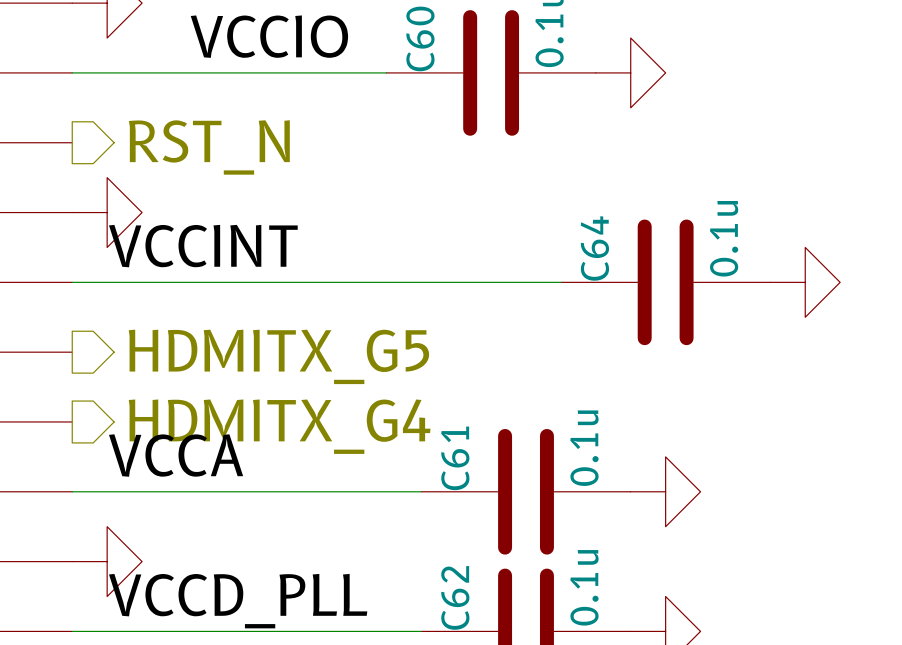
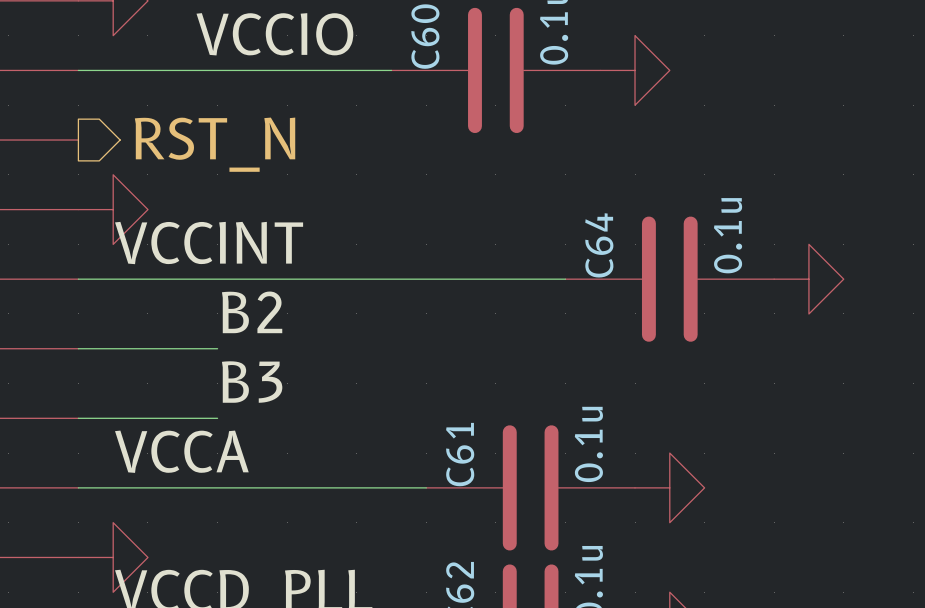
label: none -> B2 (252, 312)
wire: none -> (78, 348) (217, 348)
hierarchical label: HDMITX_G5 (278, 356) -> none
label: none -> B3 (252, 382)
wire: none -> (78, 418) (217, 418)
hierarchical label: HDMITX_G4 (279, 426) -> none

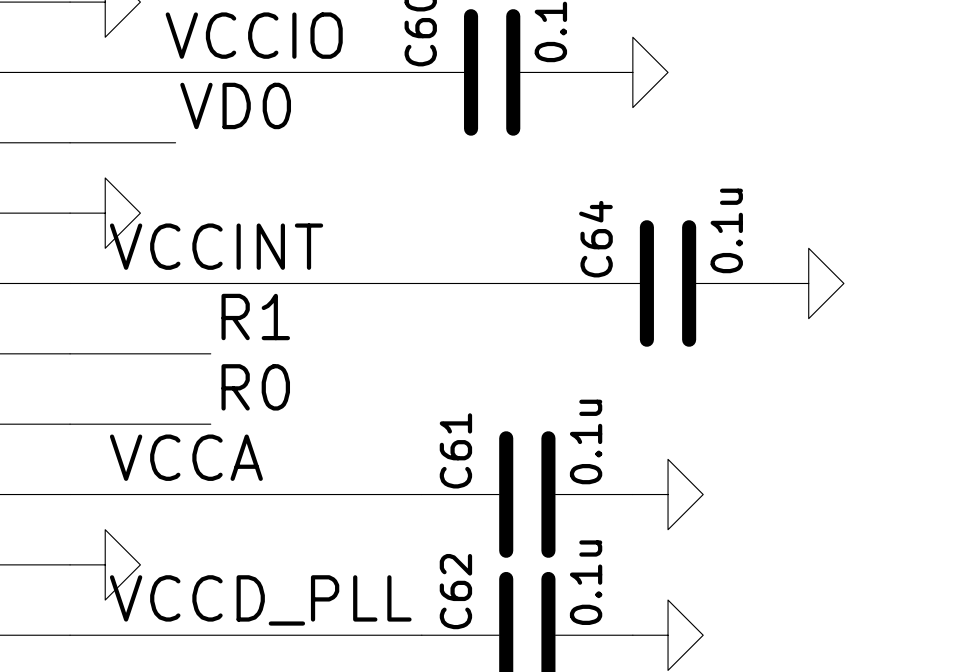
label: none -> VD0 (235, 105)
wire: none -> (70, 142) (175, 142)
hierarchical label: RST_N (215, 144) -> none
label: B2 (252, 312) -> R1 (255, 317)
label: B3 (252, 382) -> R0 (255, 387)

